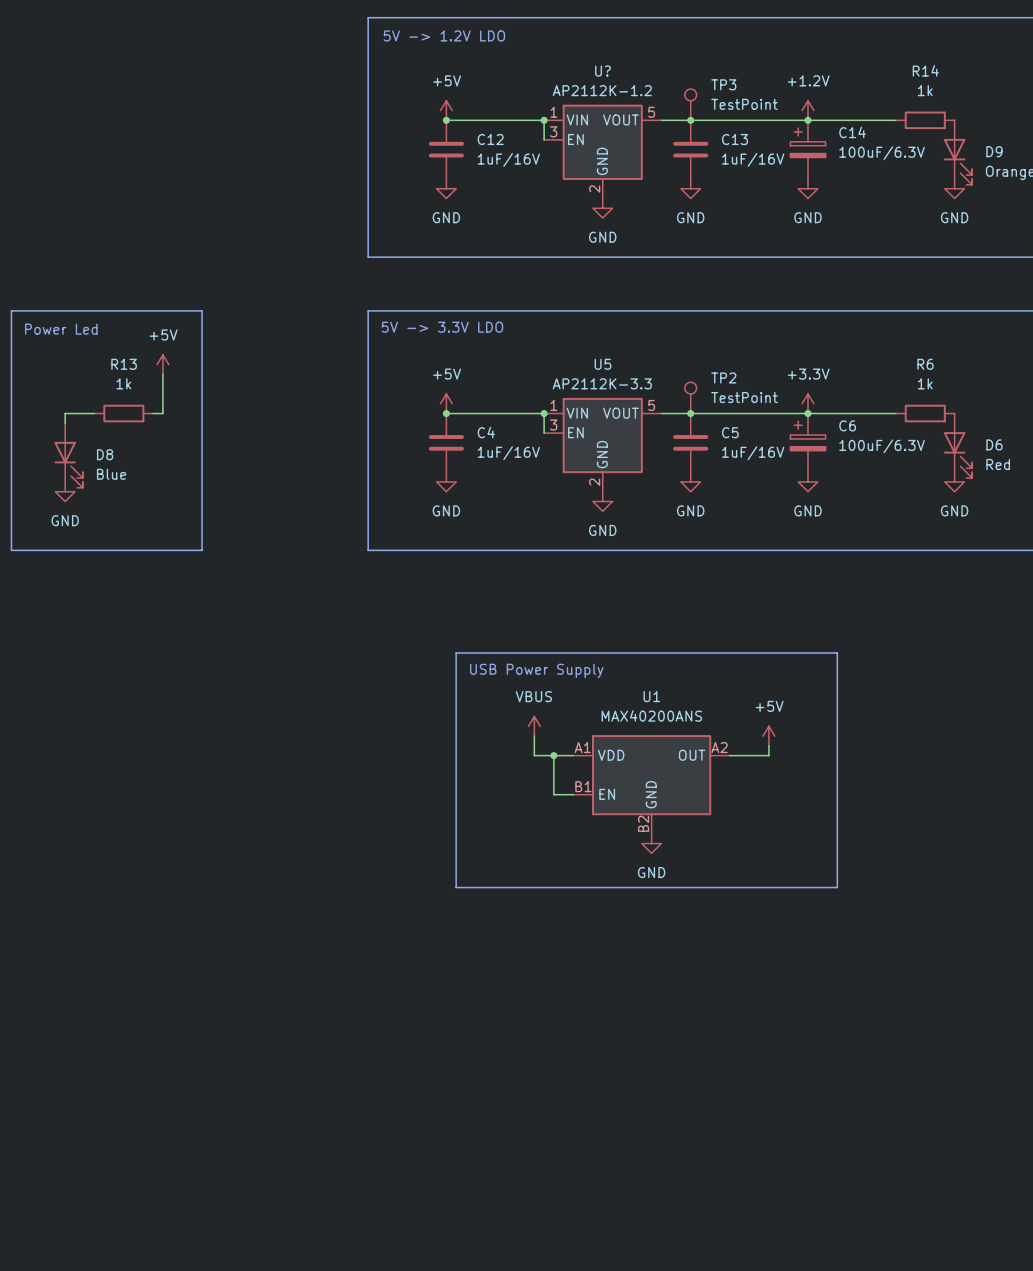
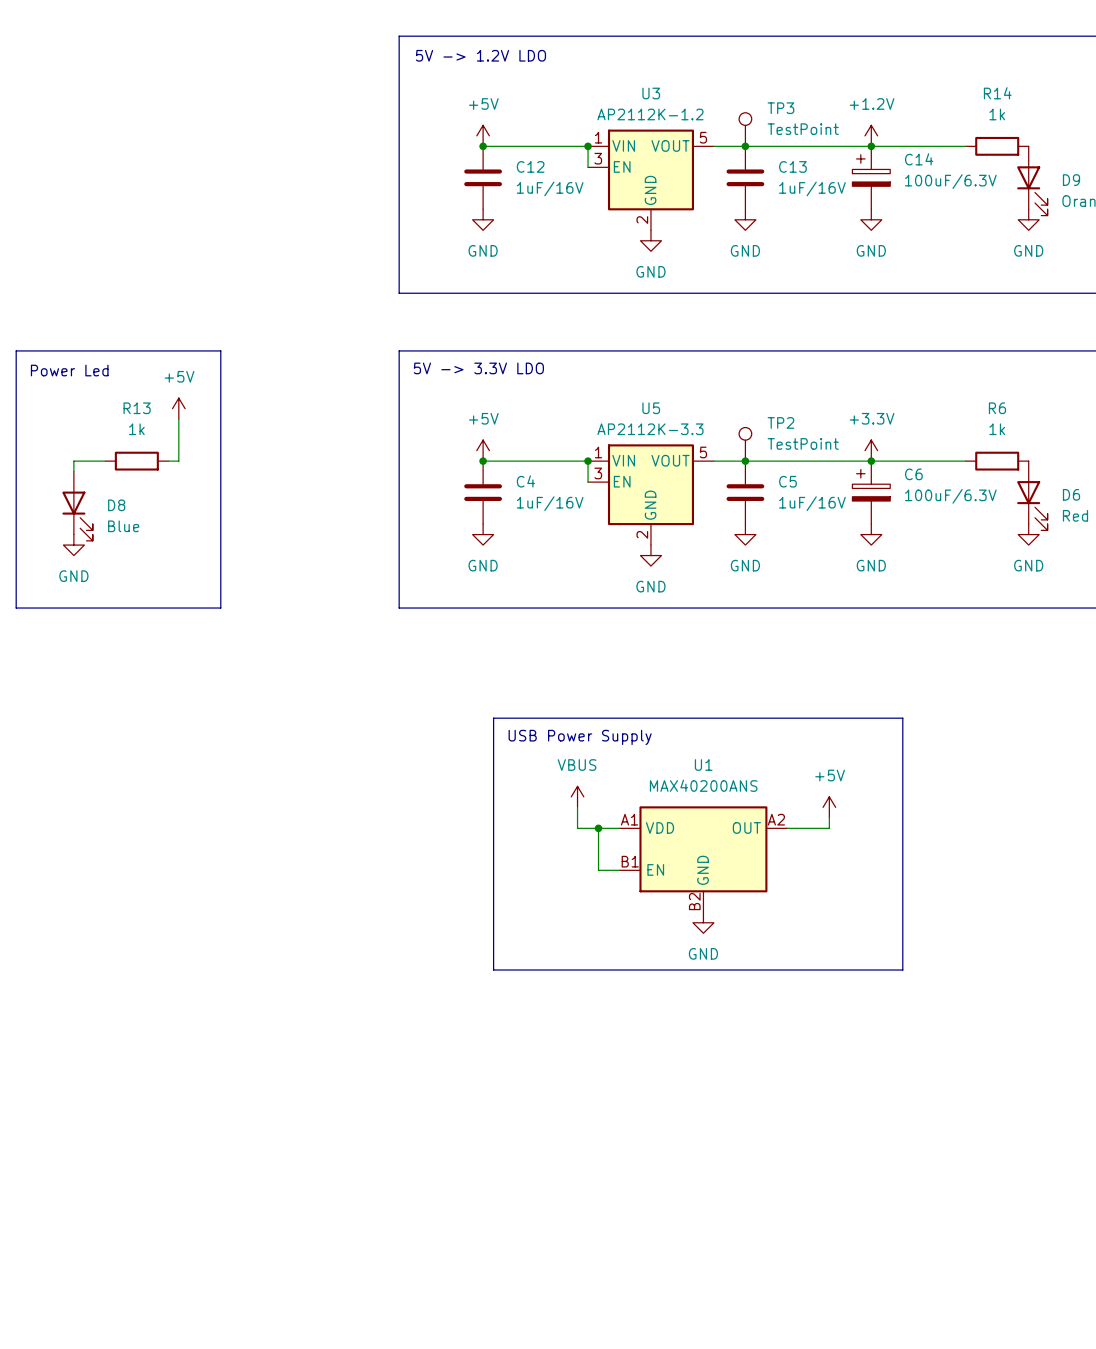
U? name: U? (602, 71) -> U3 (651, 93)

